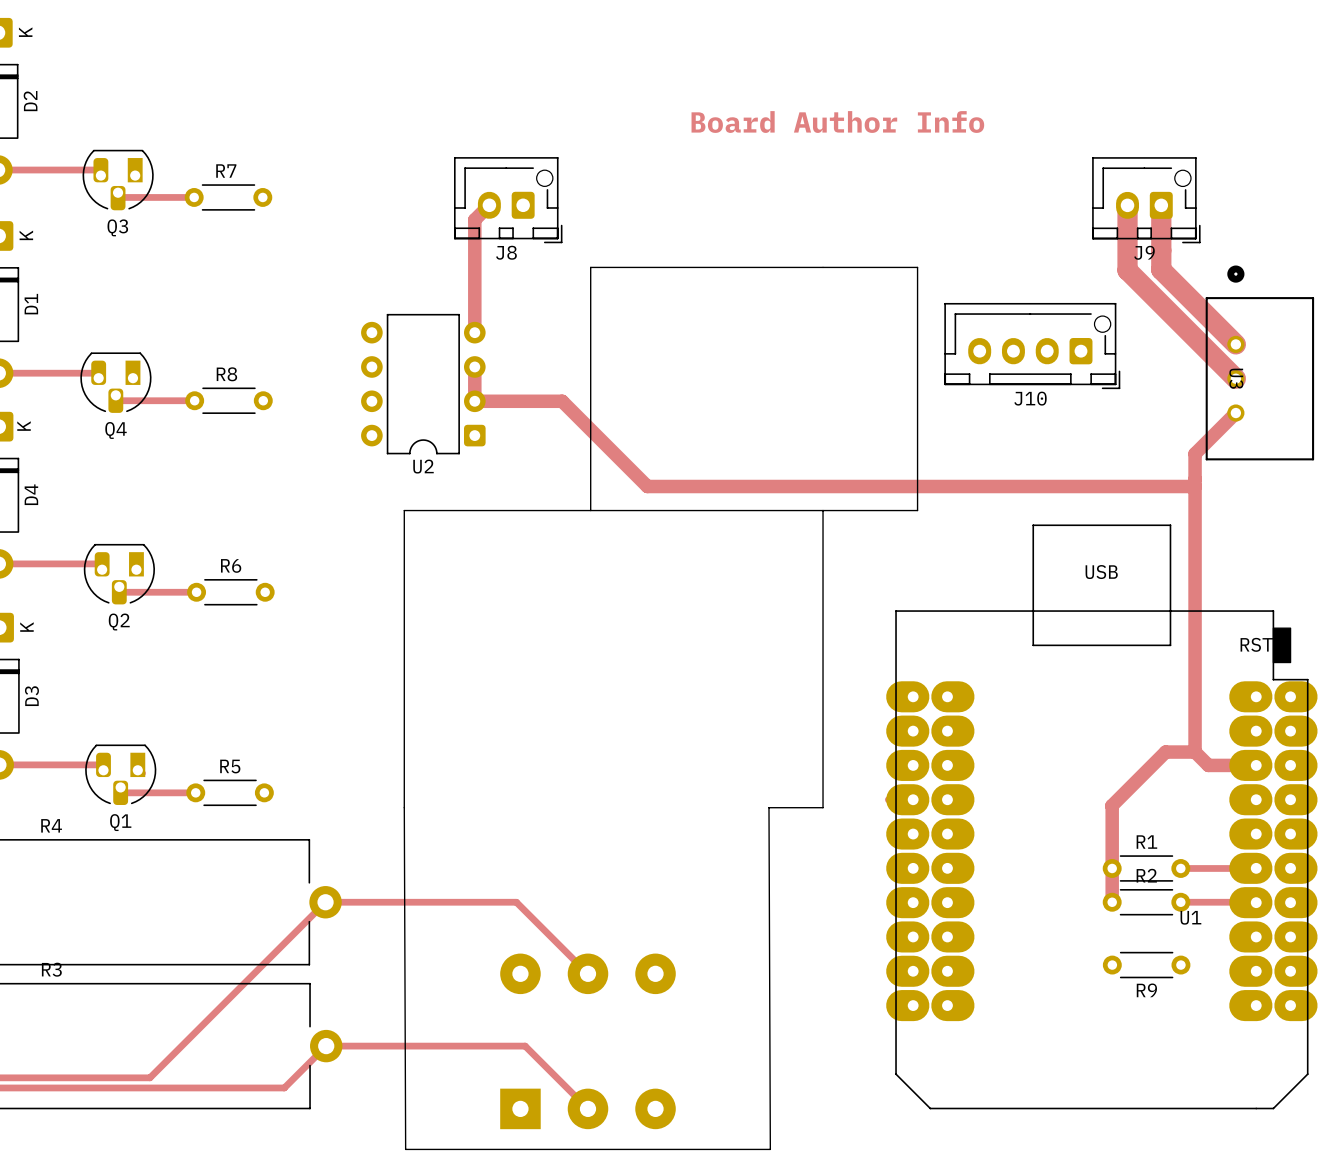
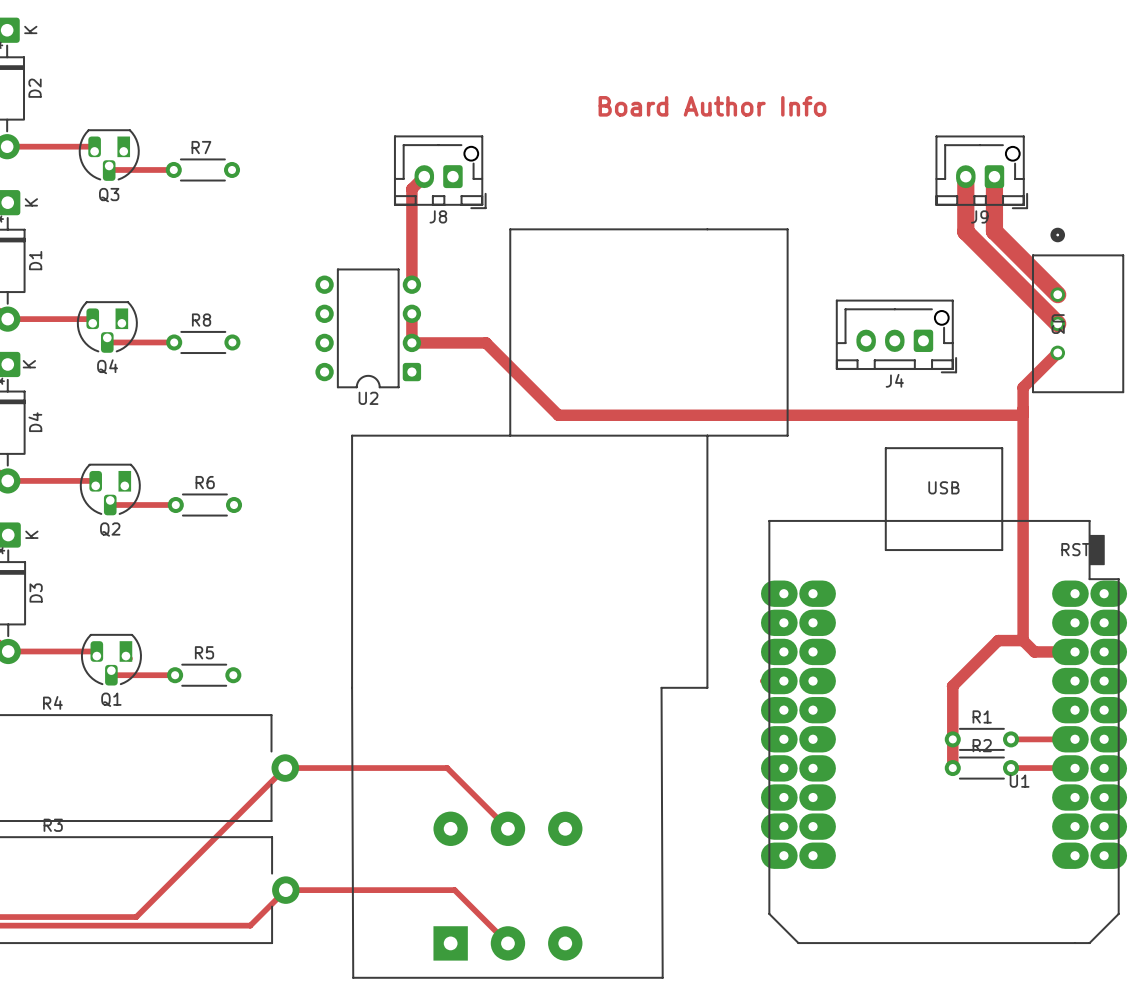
J10: (1032, 346) -> none
J4: none -> (896, 336)
R9: (1146, 965) -> none

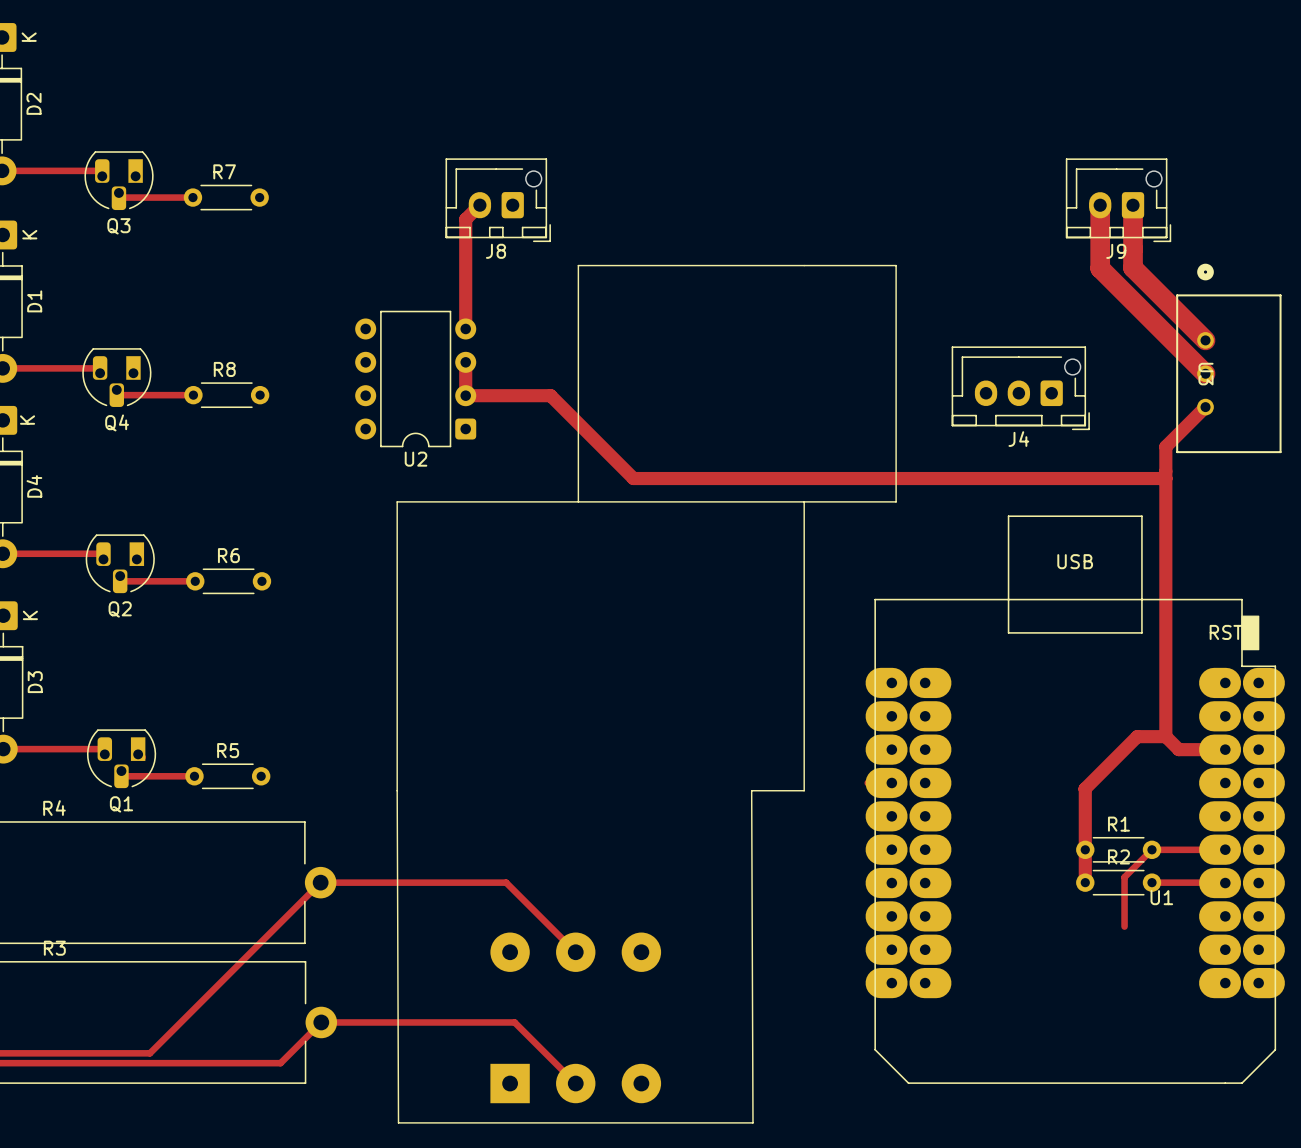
text: Board Author Info (712, 106) -> none
track: none -> (1151, 849) (1124, 877) (1124, 926)

